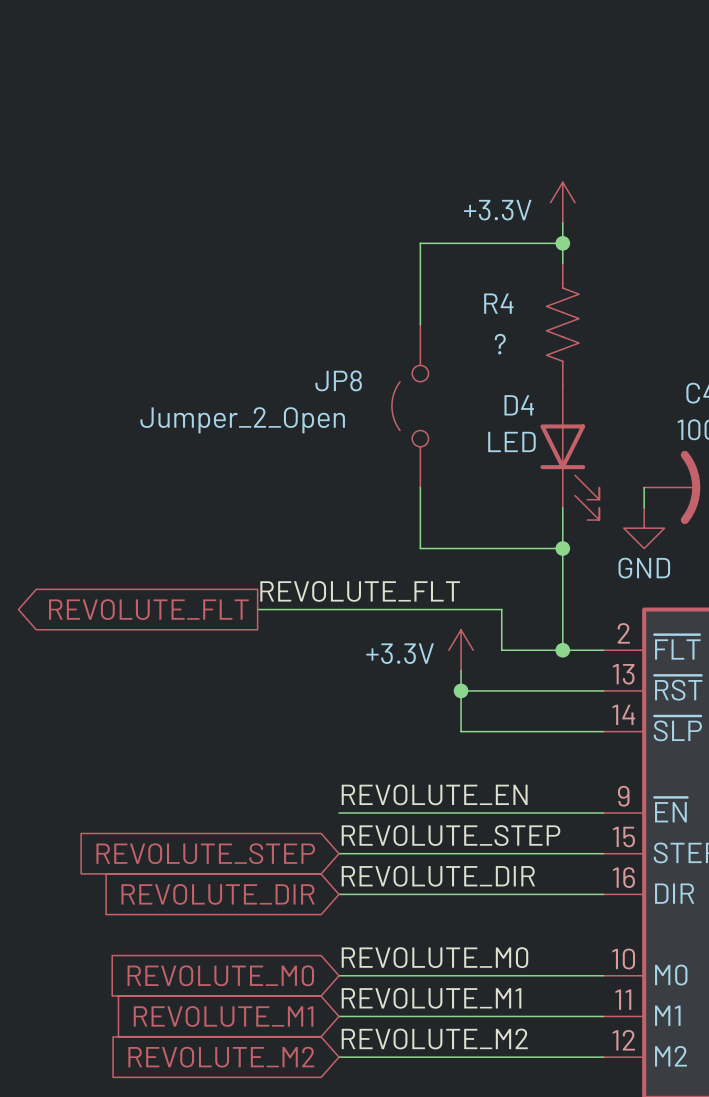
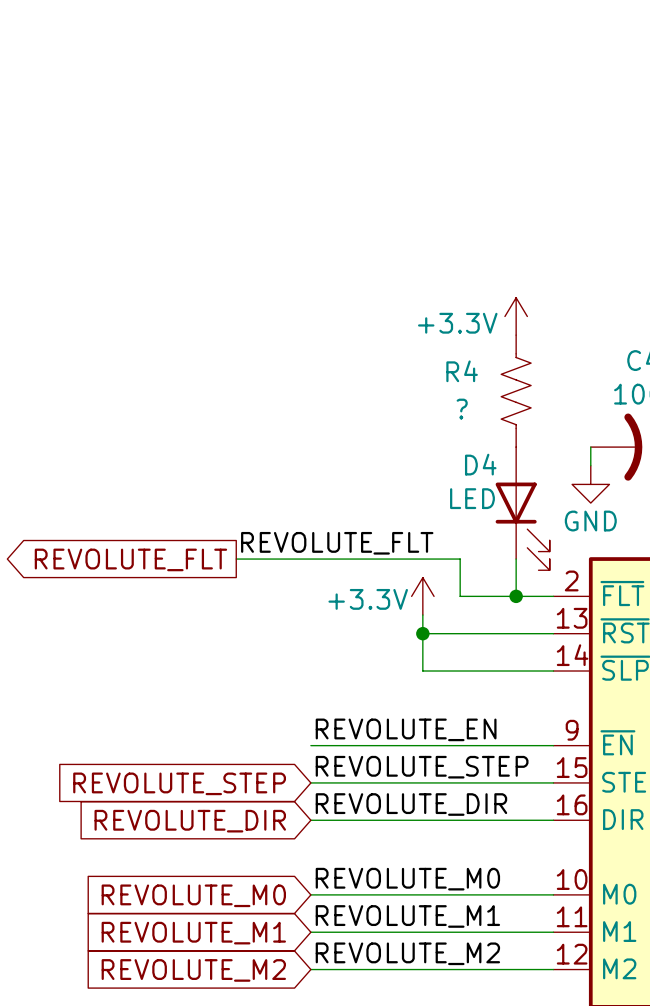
power symbol position: +3.3V (562, 202) -> +3.3V (516, 316)
wire: (562, 223) (562, 263) -> none
wire: (562, 243) (420, 243) (420, 324) -> none
junction: (562, 243) -> none
R4 position: (562, 324) -> (516, 391)
JP8: Jumper_2_Open (410, 406) -> none
D4 position: (569, 452) -> (522, 508)
wire: (420, 487) (420, 548) (562, 548) -> none
junction: (562, 548) -> none

